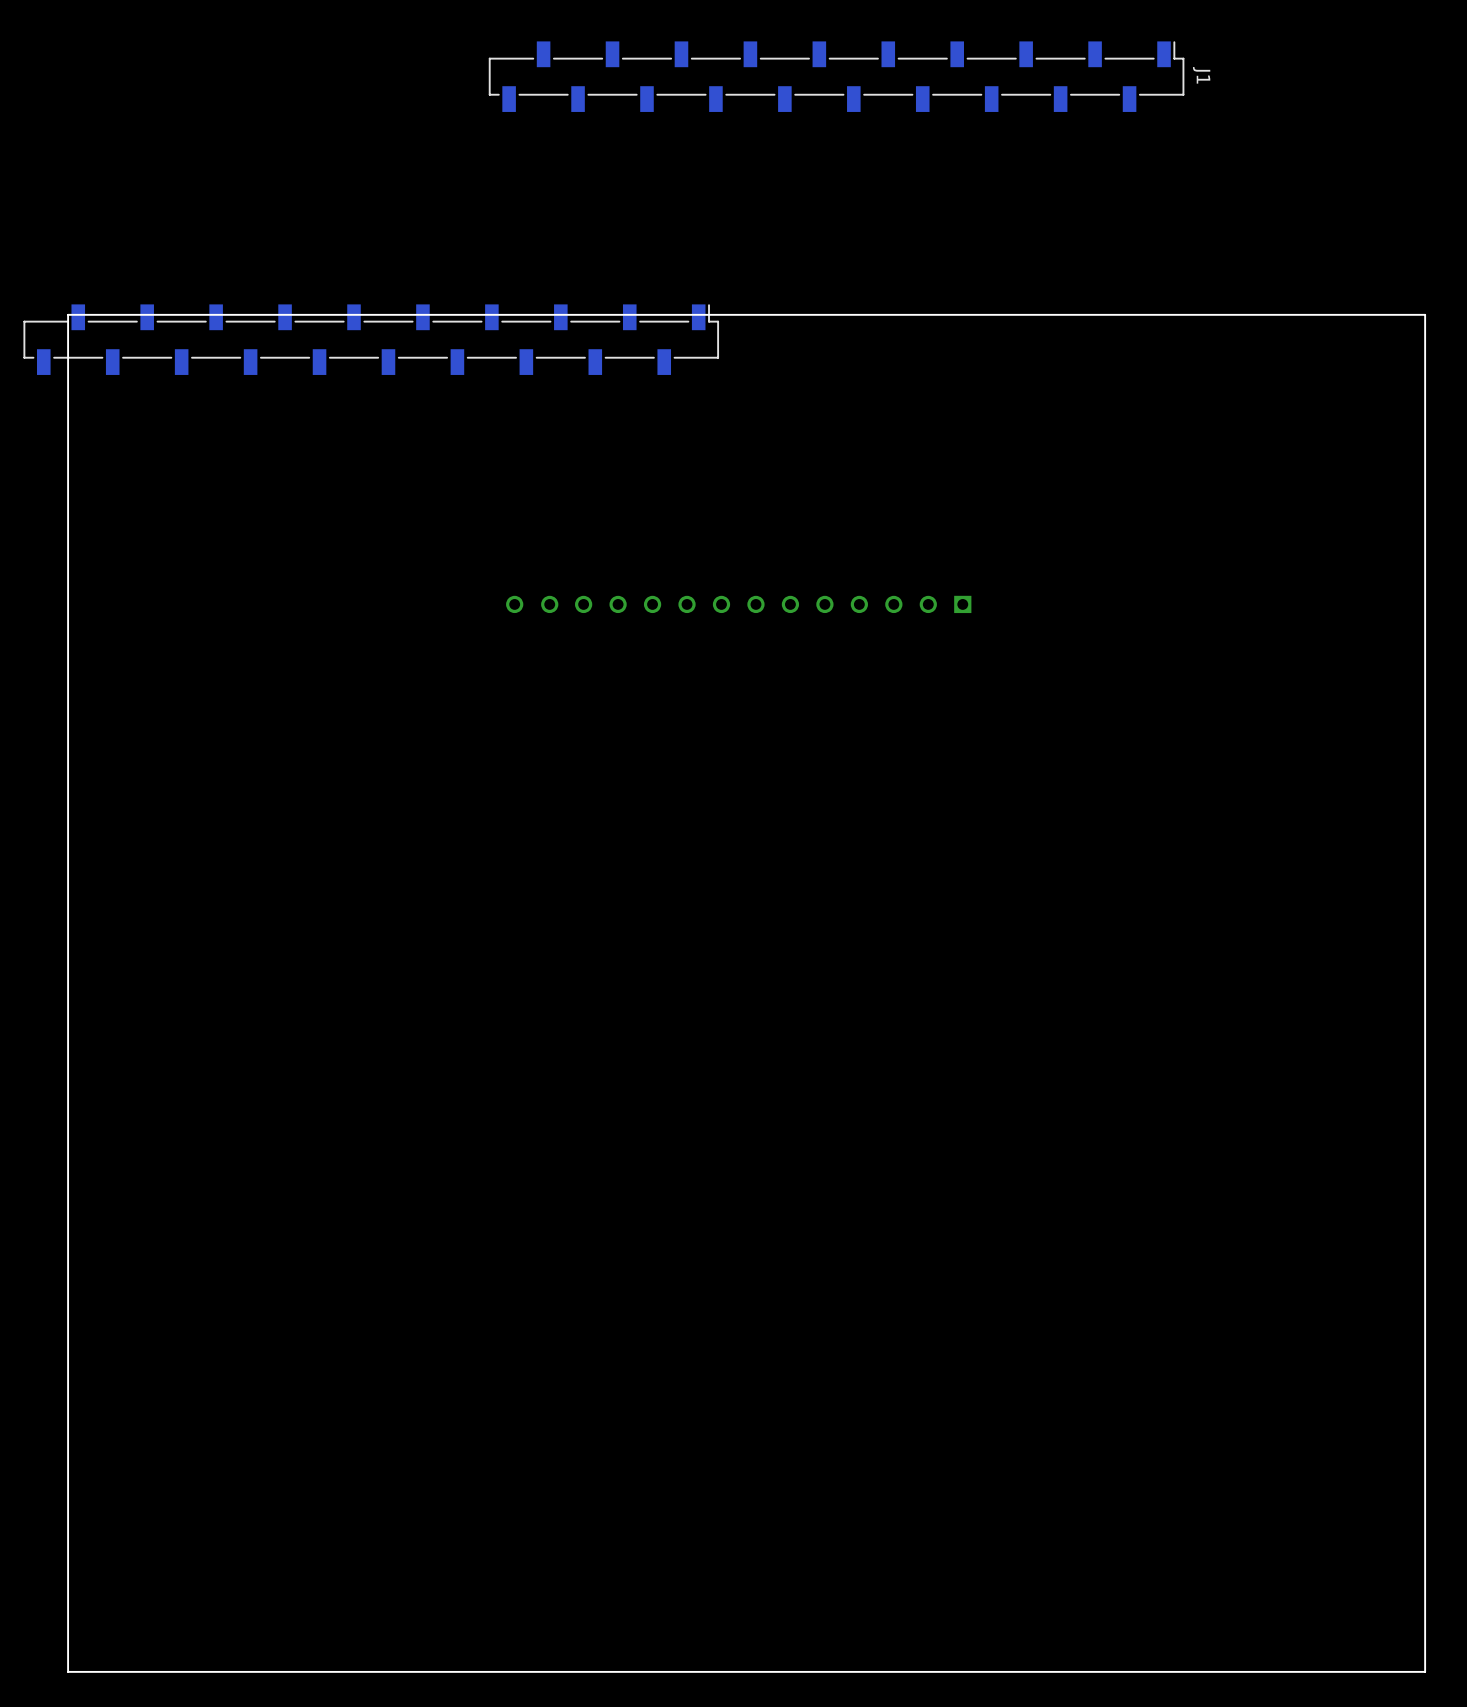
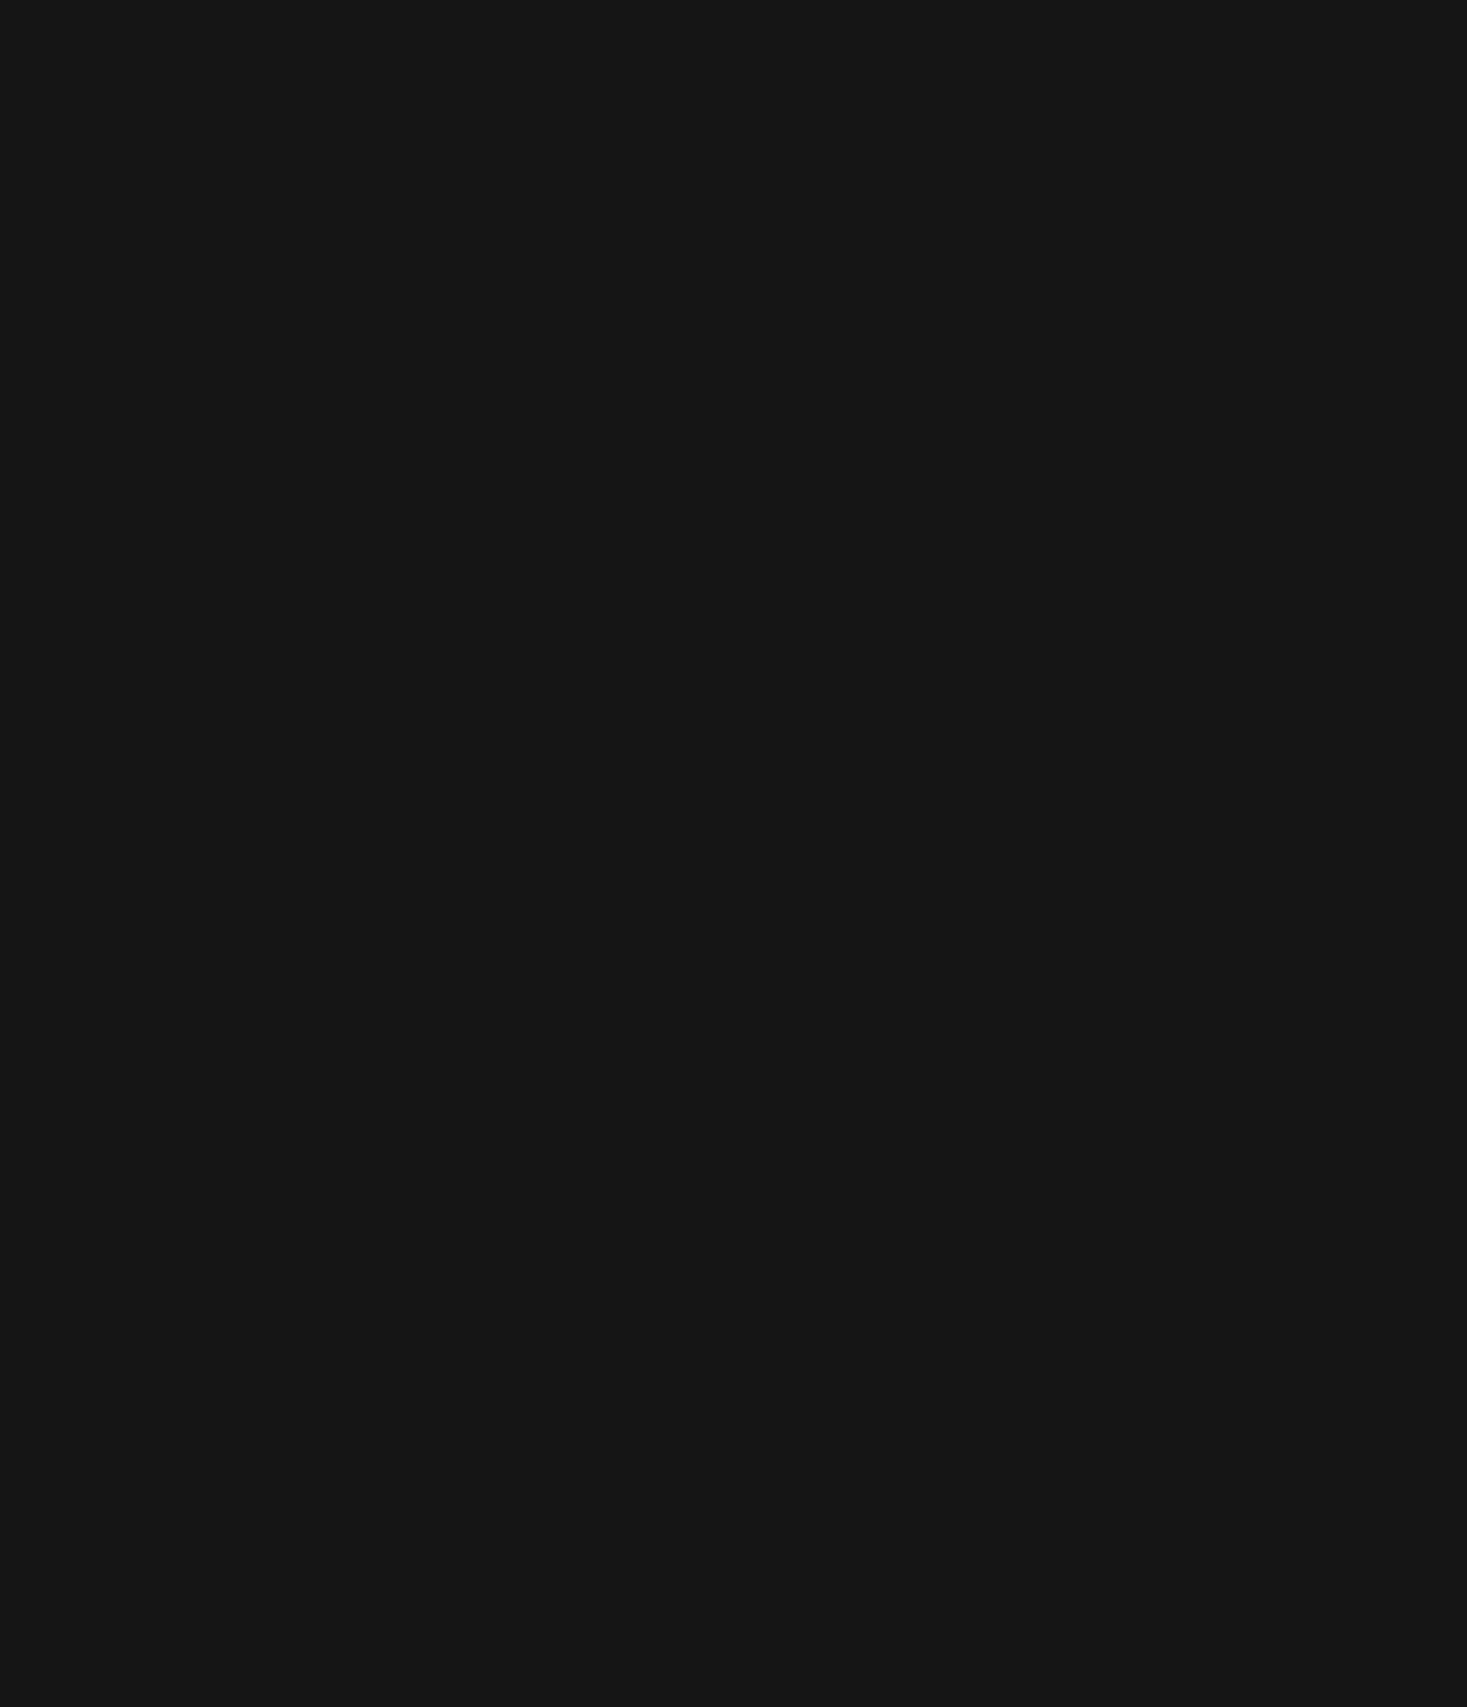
J1: (836, 76) -> none
board edge: (1425, 314) (68, 314) (68, 1671) (1425, 1671) (1425, 314) -> none
part: (371, 339) -> none
part: (738, 604) -> none

